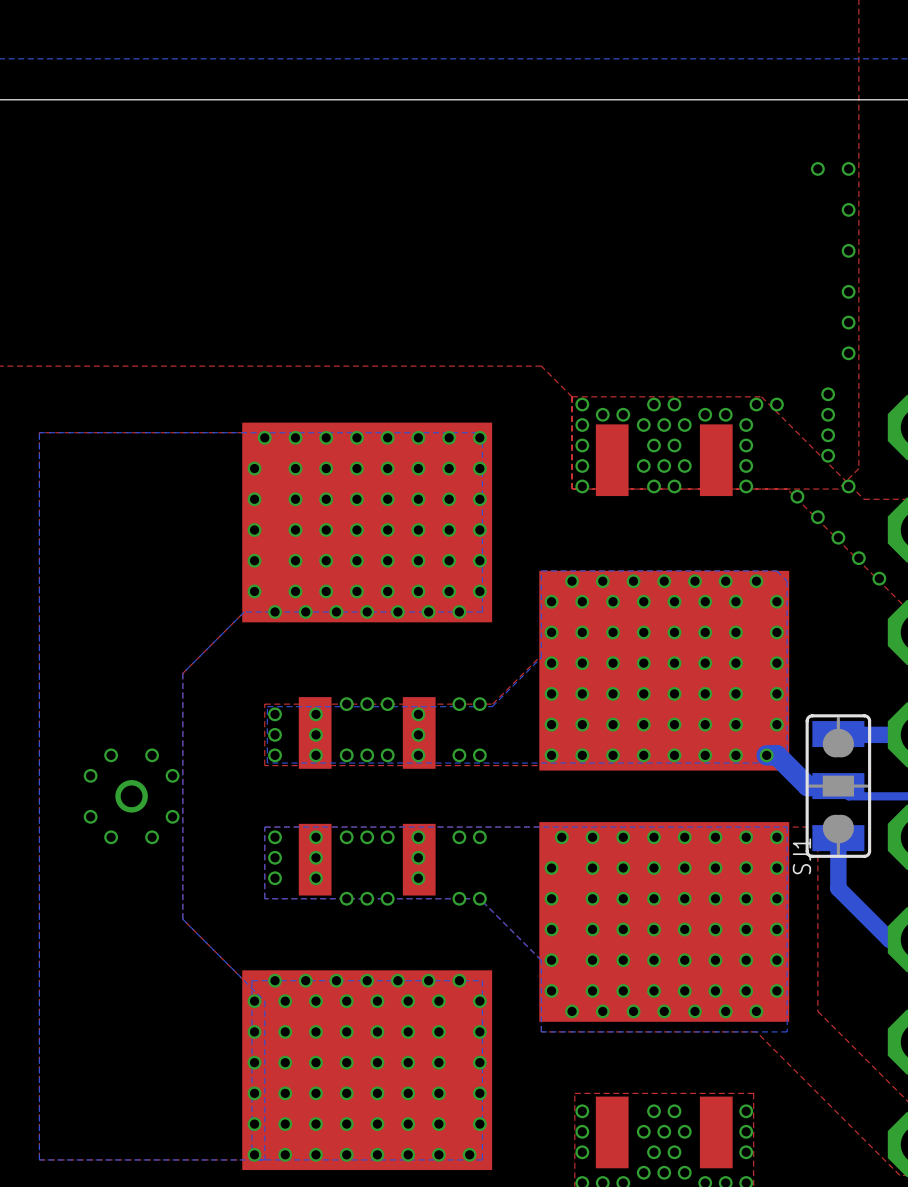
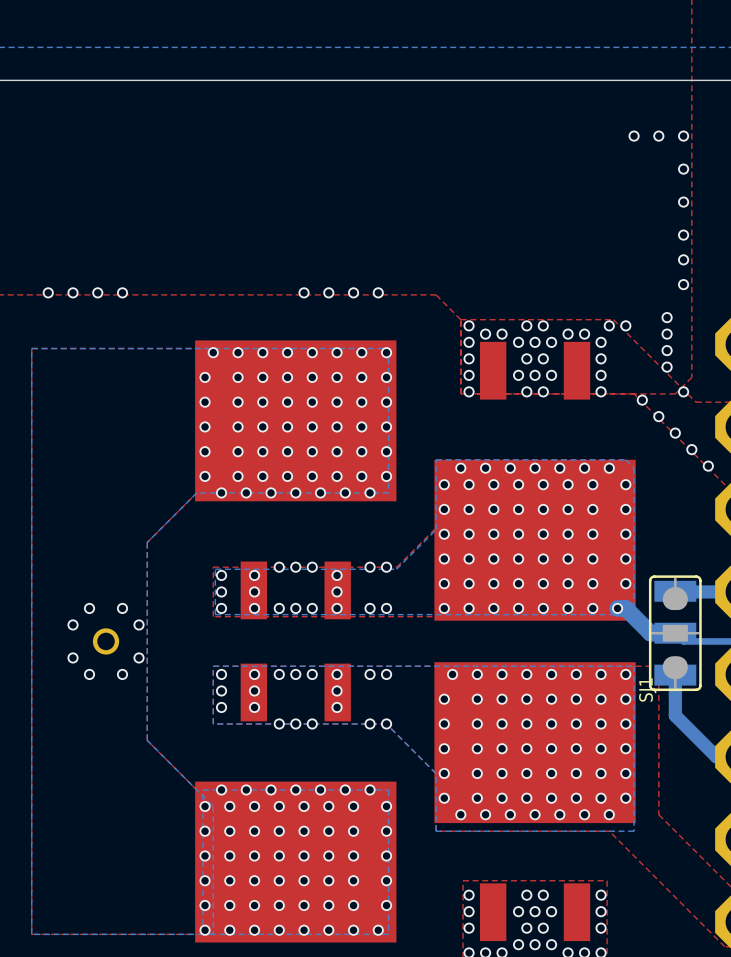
via: none -> (634, 136)
via: none -> (48, 292)
via: none -> (73, 292)
via: none -> (97, 292)
via: none -> (122, 292)
via: none -> (304, 292)
via: none -> (328, 292)
via: none -> (353, 292)
via: none -> (378, 292)

